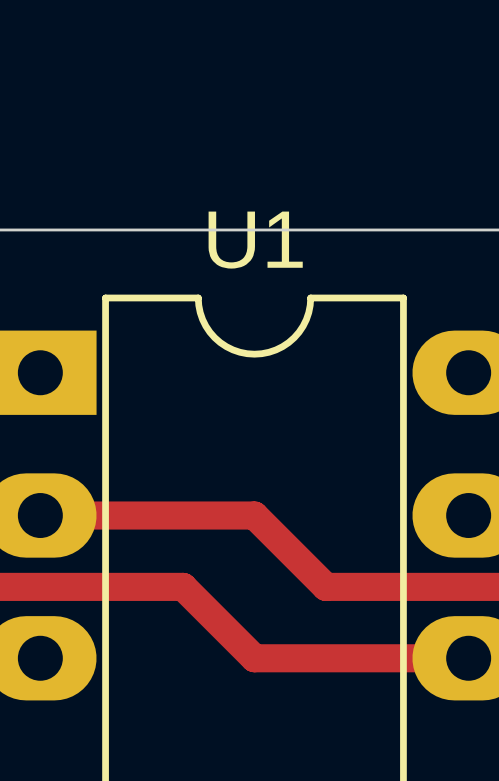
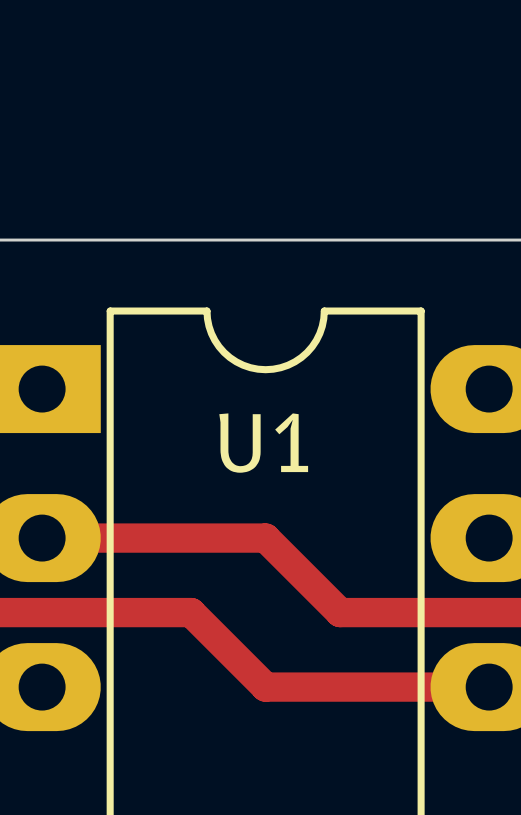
U1 name position: U1 (255, 240) -> U1 (263, 443)

